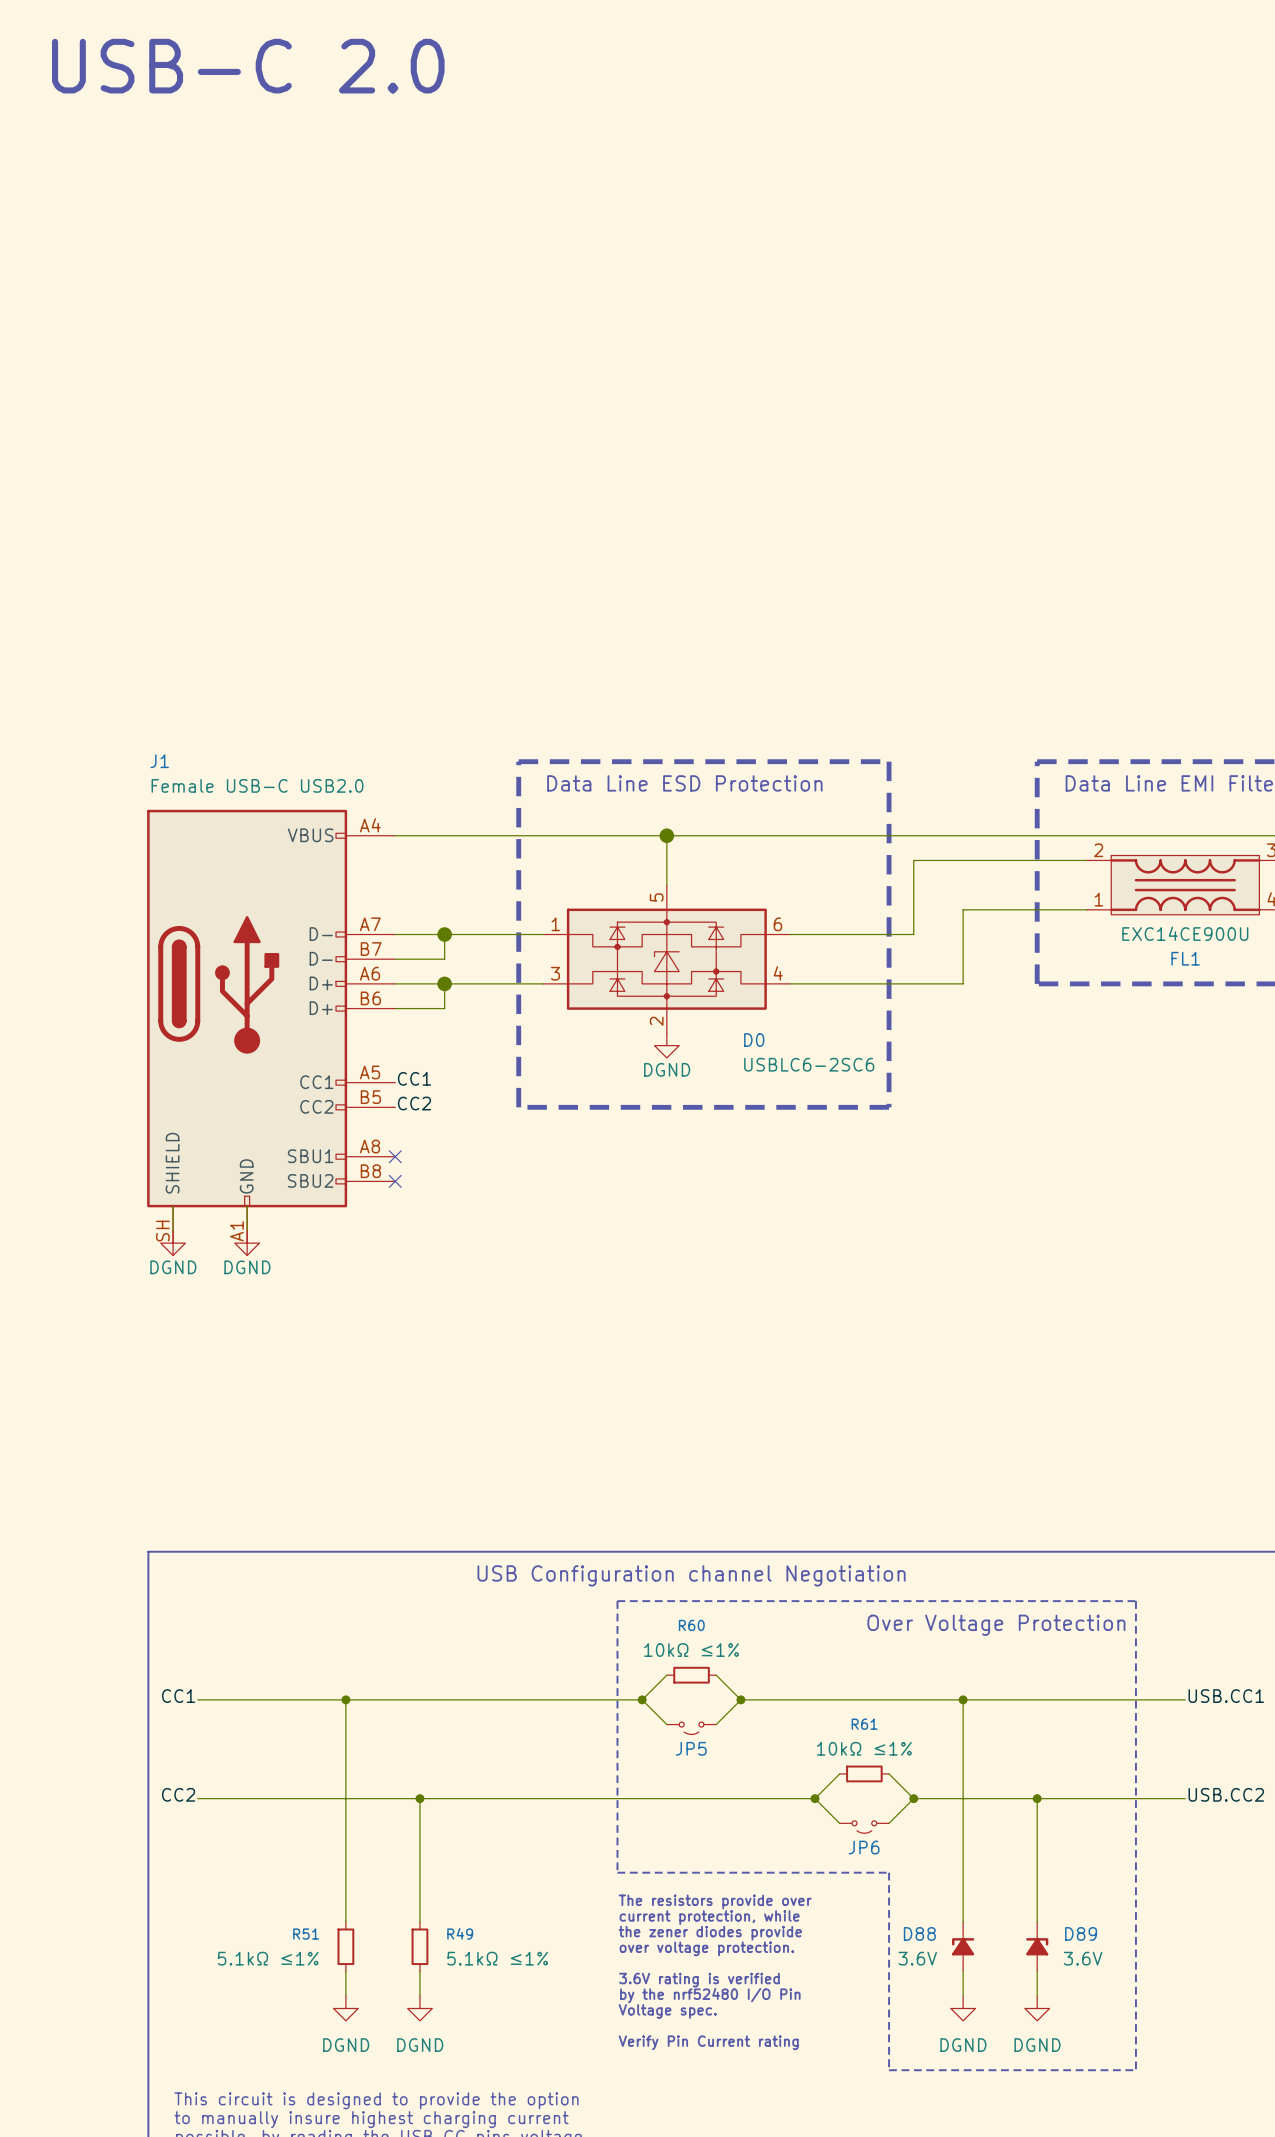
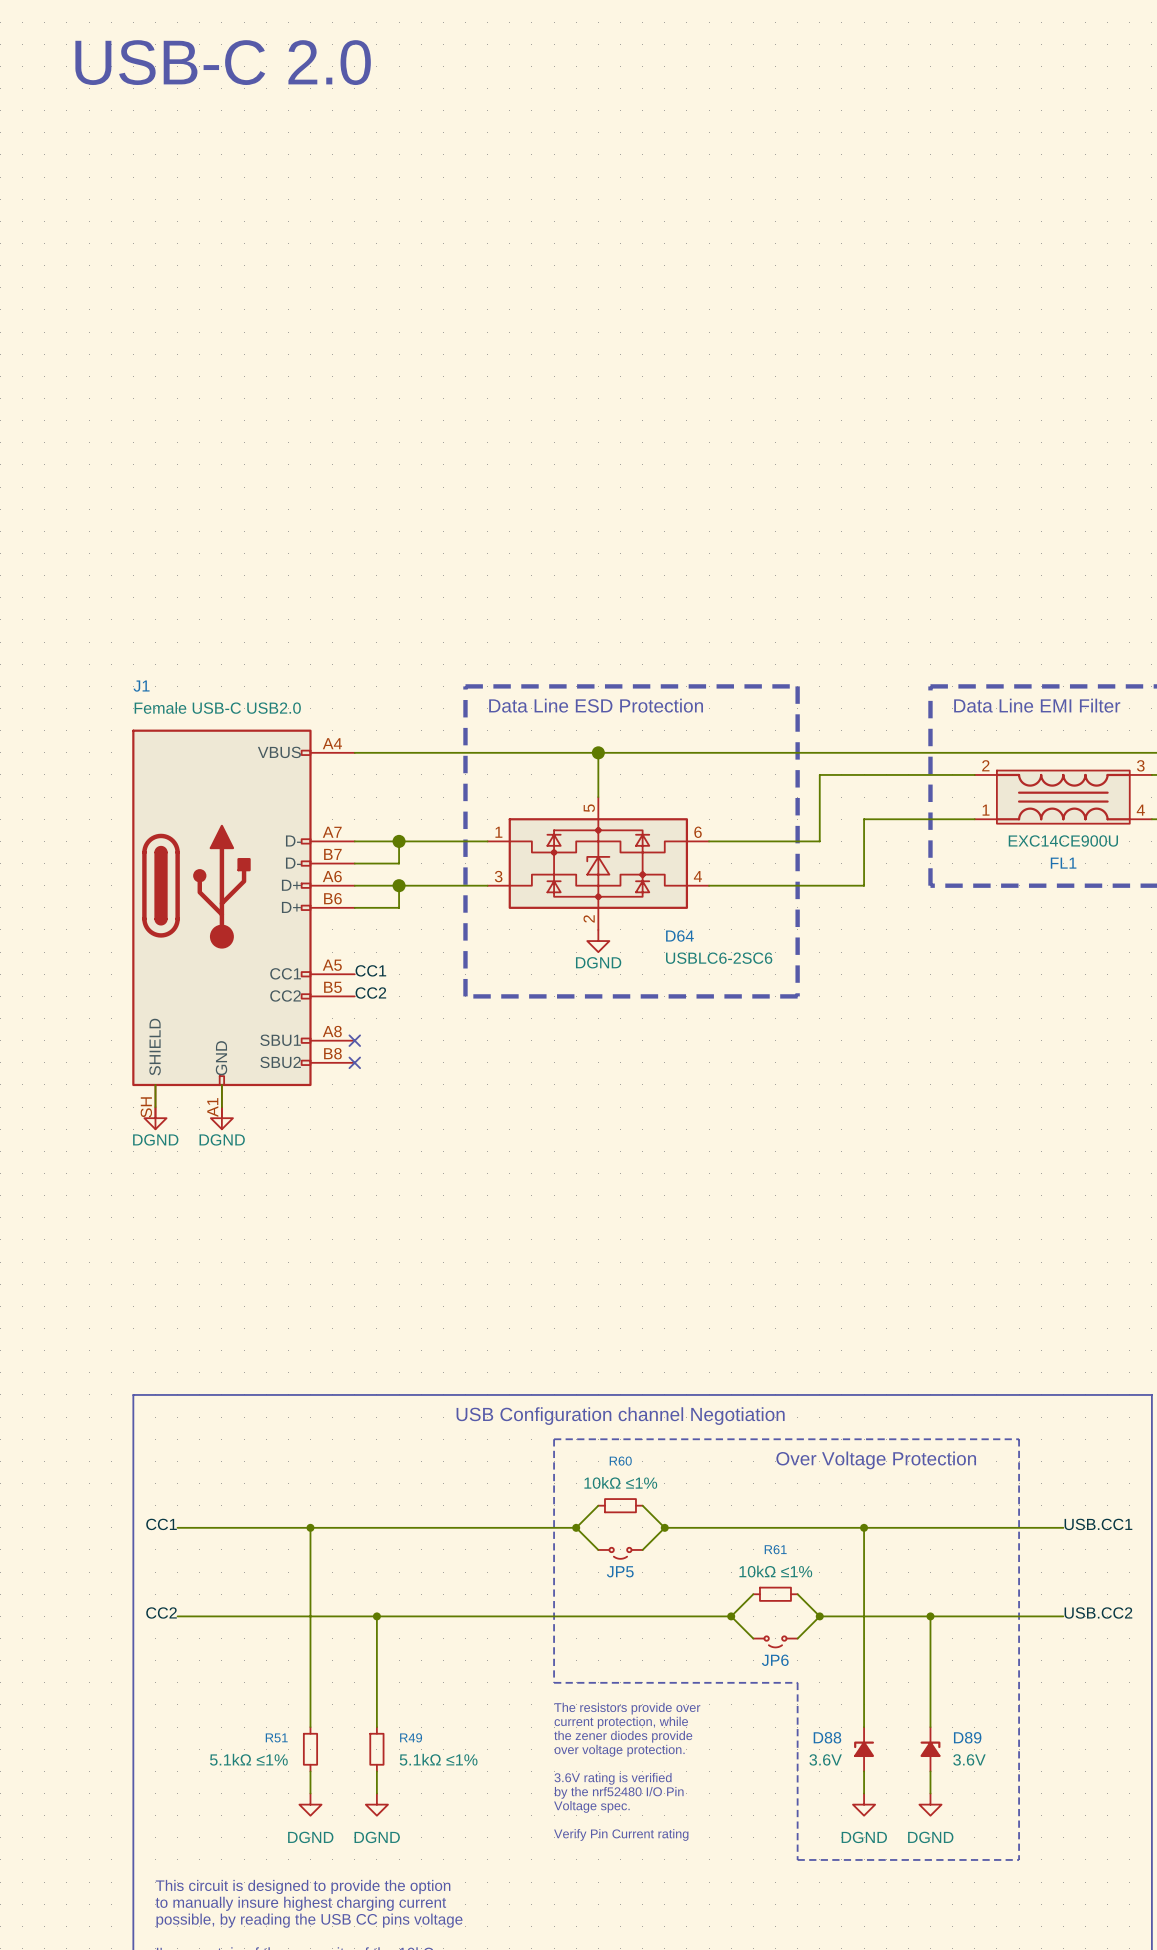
D0 name: D0 (754, 1040) -> D64 (679, 936)

